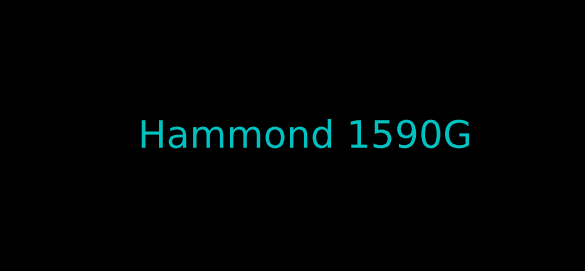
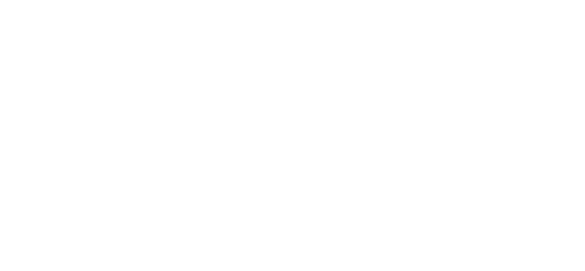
text: Hammond 1590G (305, 133) -> none

